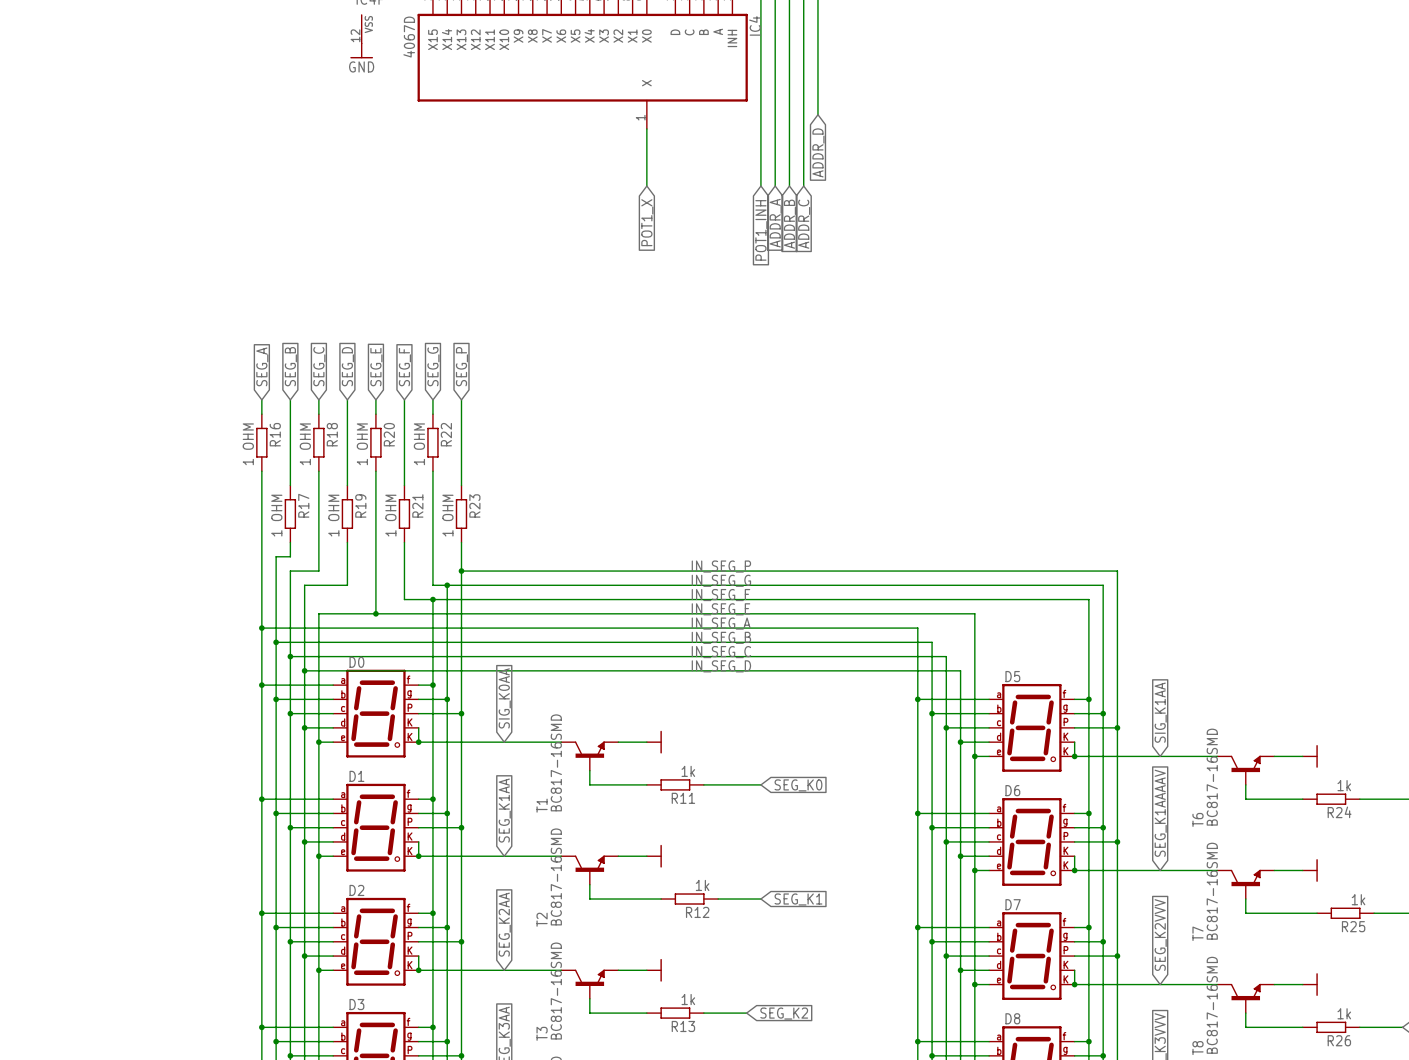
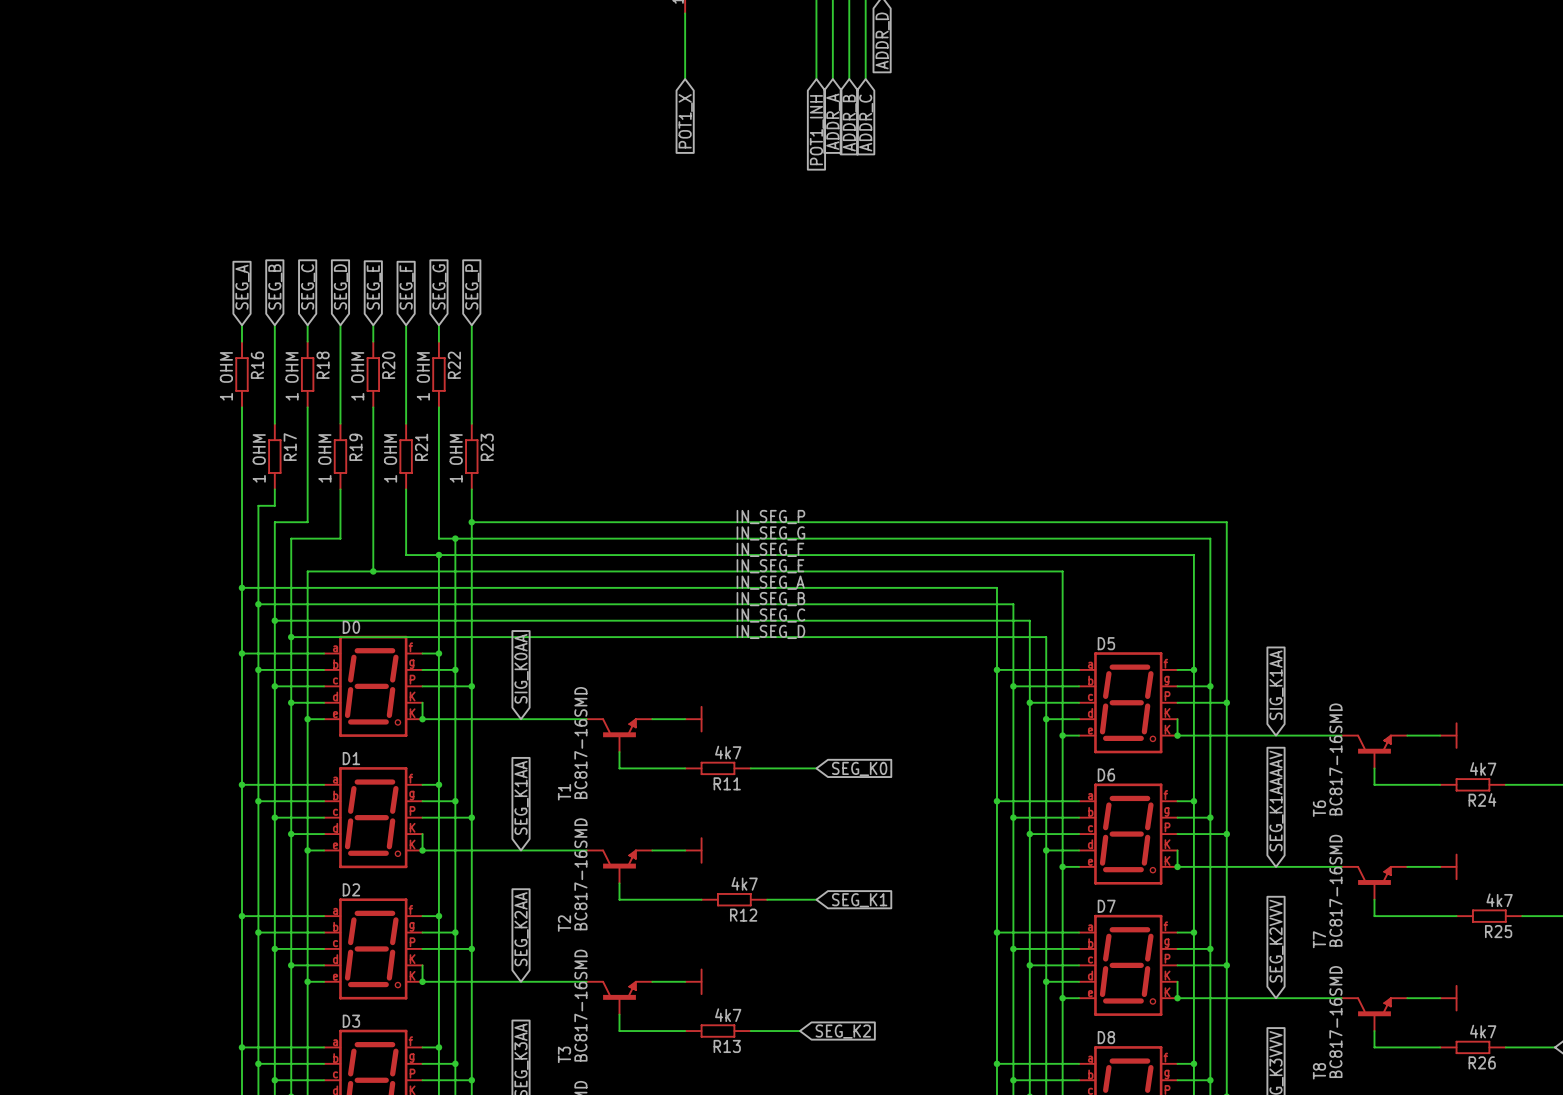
R11 value: 1k (688, 771) -> 4k7 (728, 752)
R24 value: 1k (1344, 785) -> 4k7 (1483, 768)
R12 value: 1k (702, 885) -> 4k7 (744, 883)
R25 value: 1k (1358, 899) -> 4k7 (1499, 900)
R13 value: 1k (688, 999) -> 4k7 (728, 1015)
R26 value: 1k (1344, 1013) -> 4k7 (1483, 1031)

